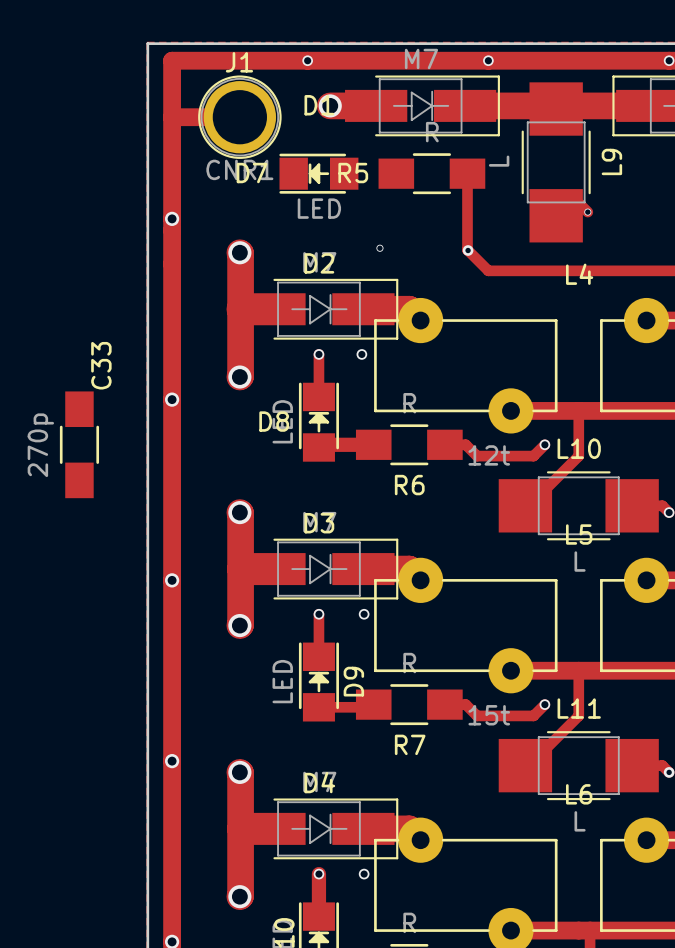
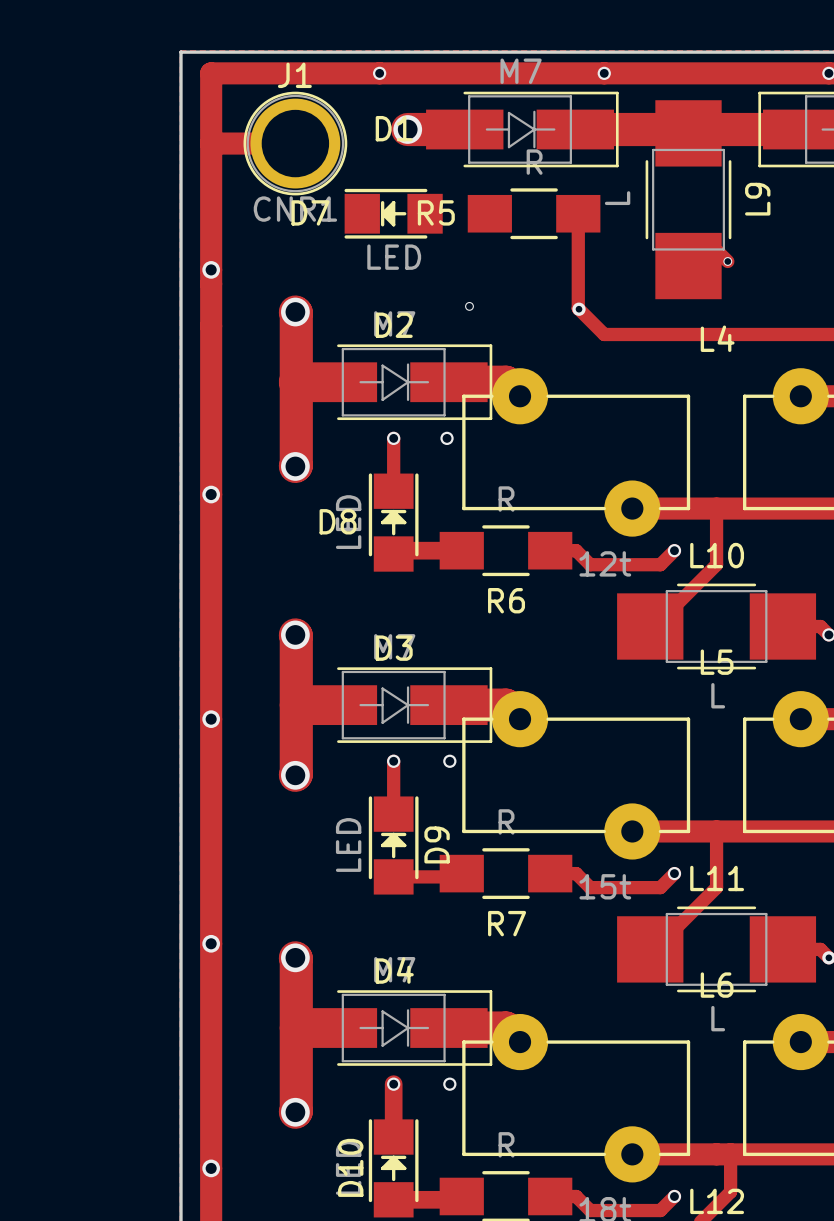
C33: 270p (79, 444) -> none

